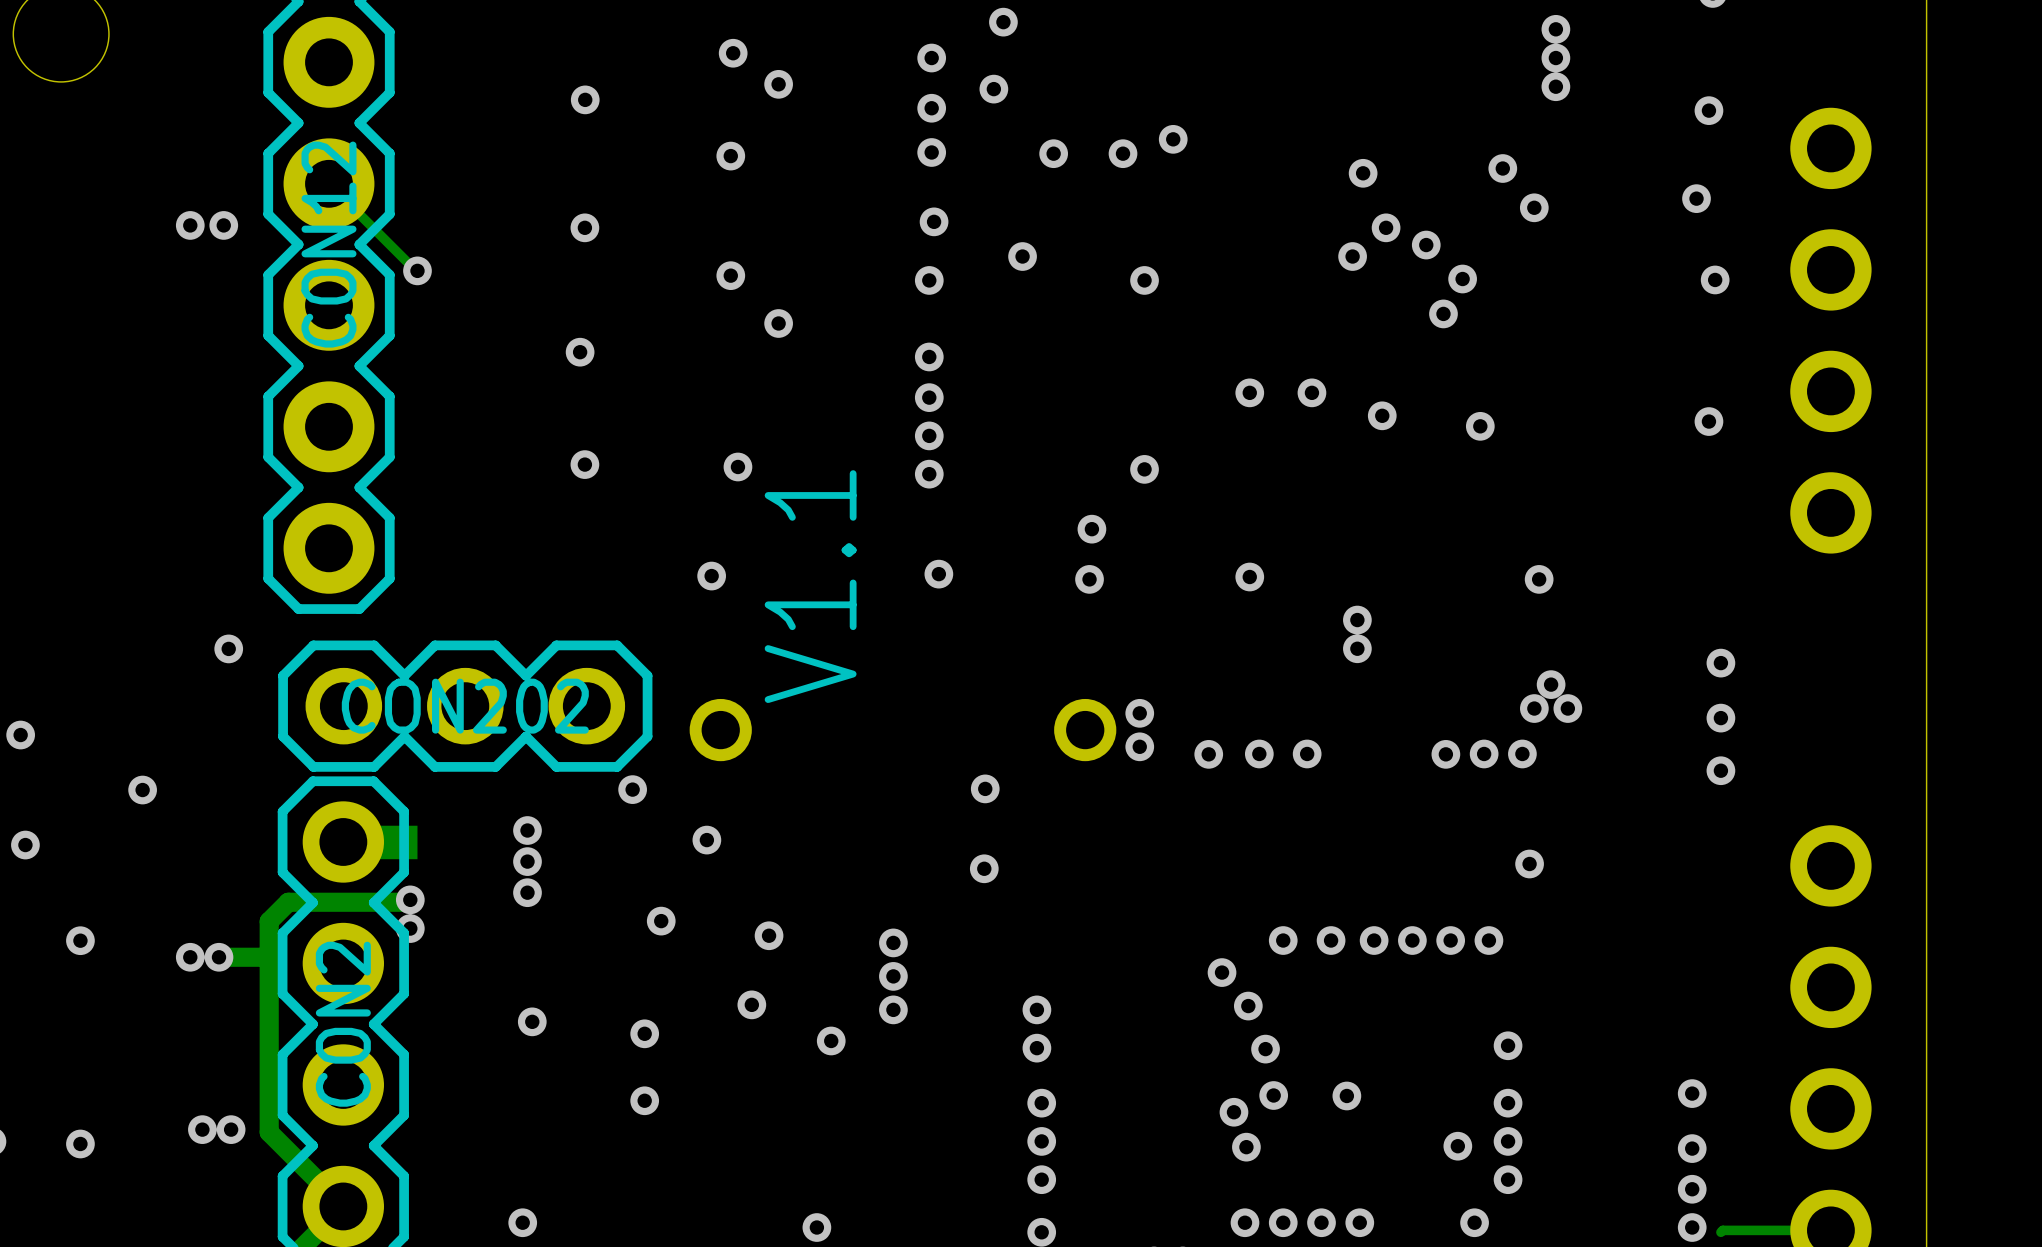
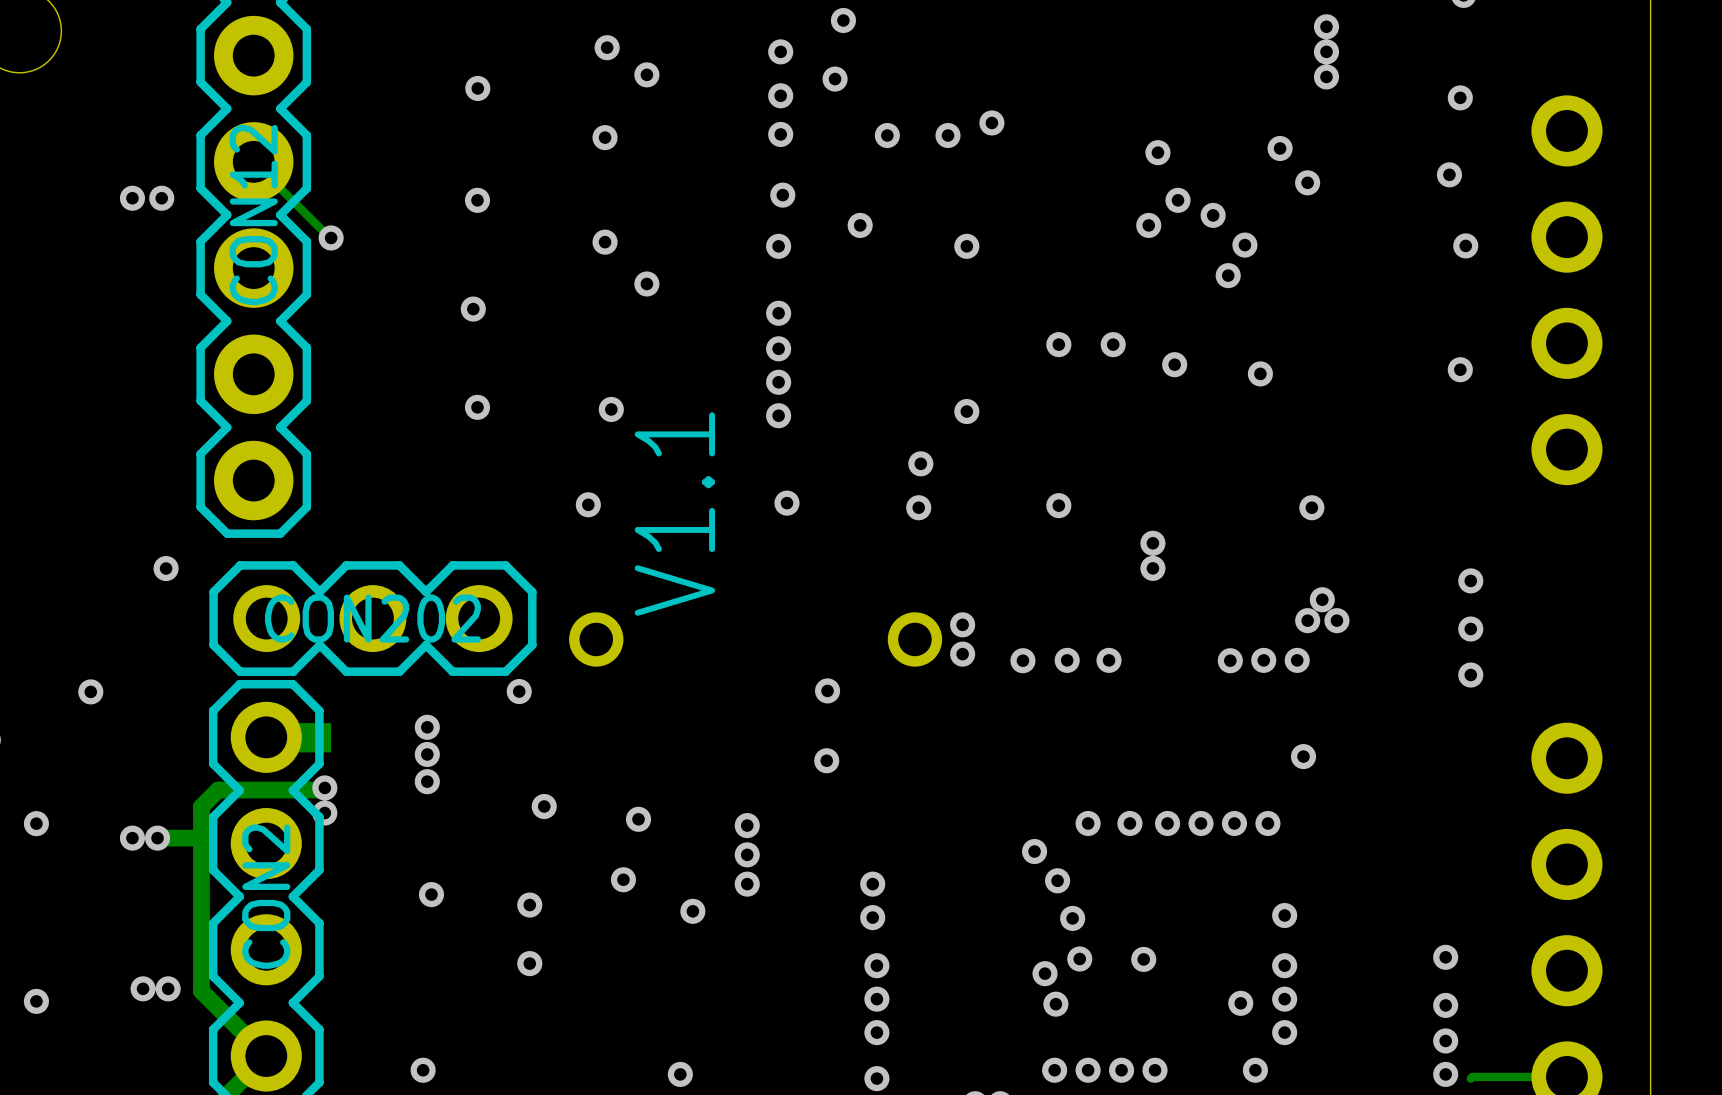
via: (706, 840) -> none

